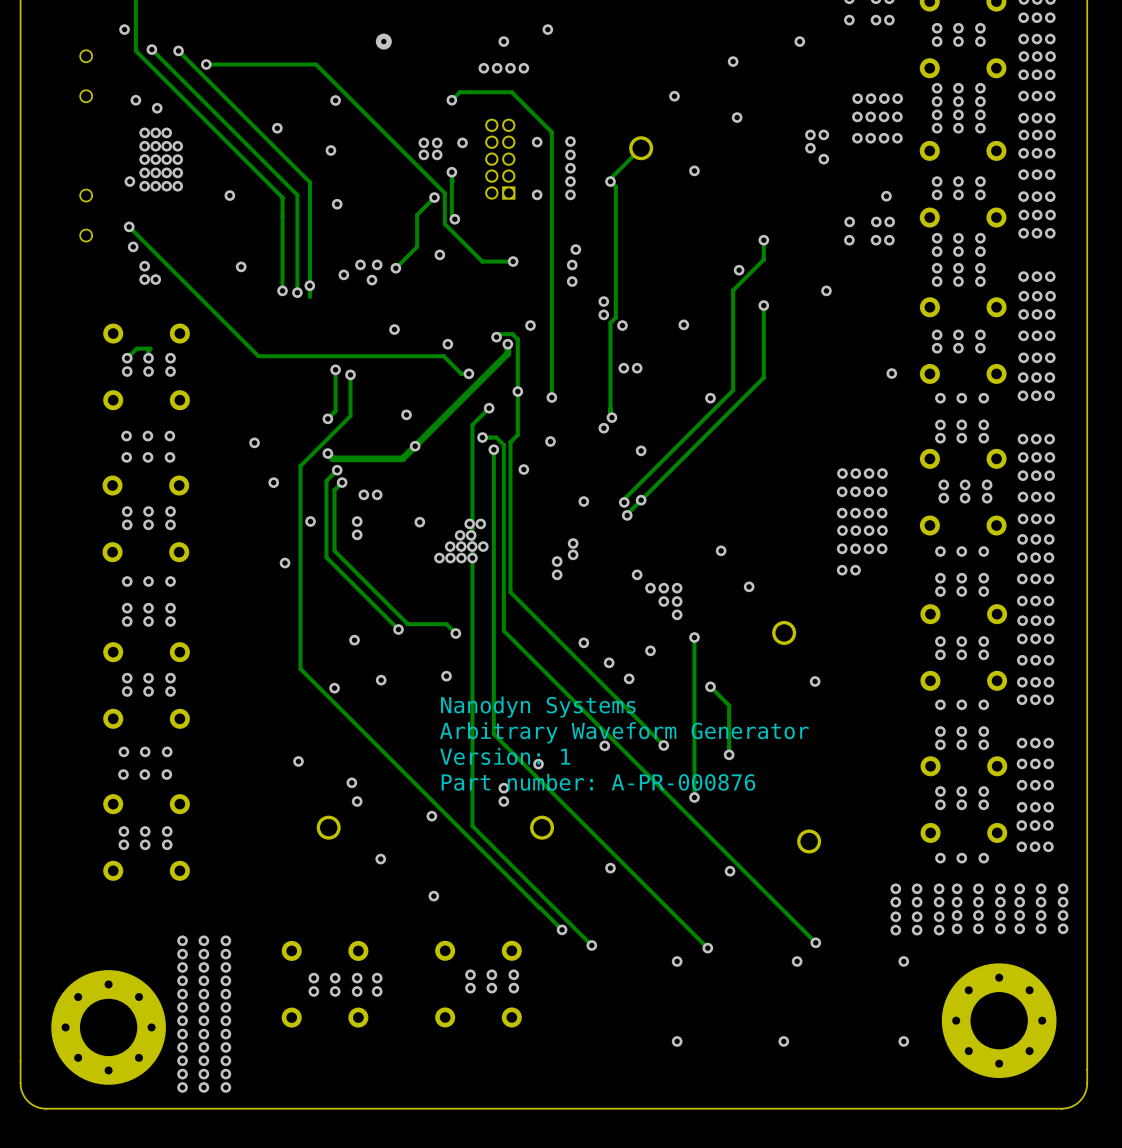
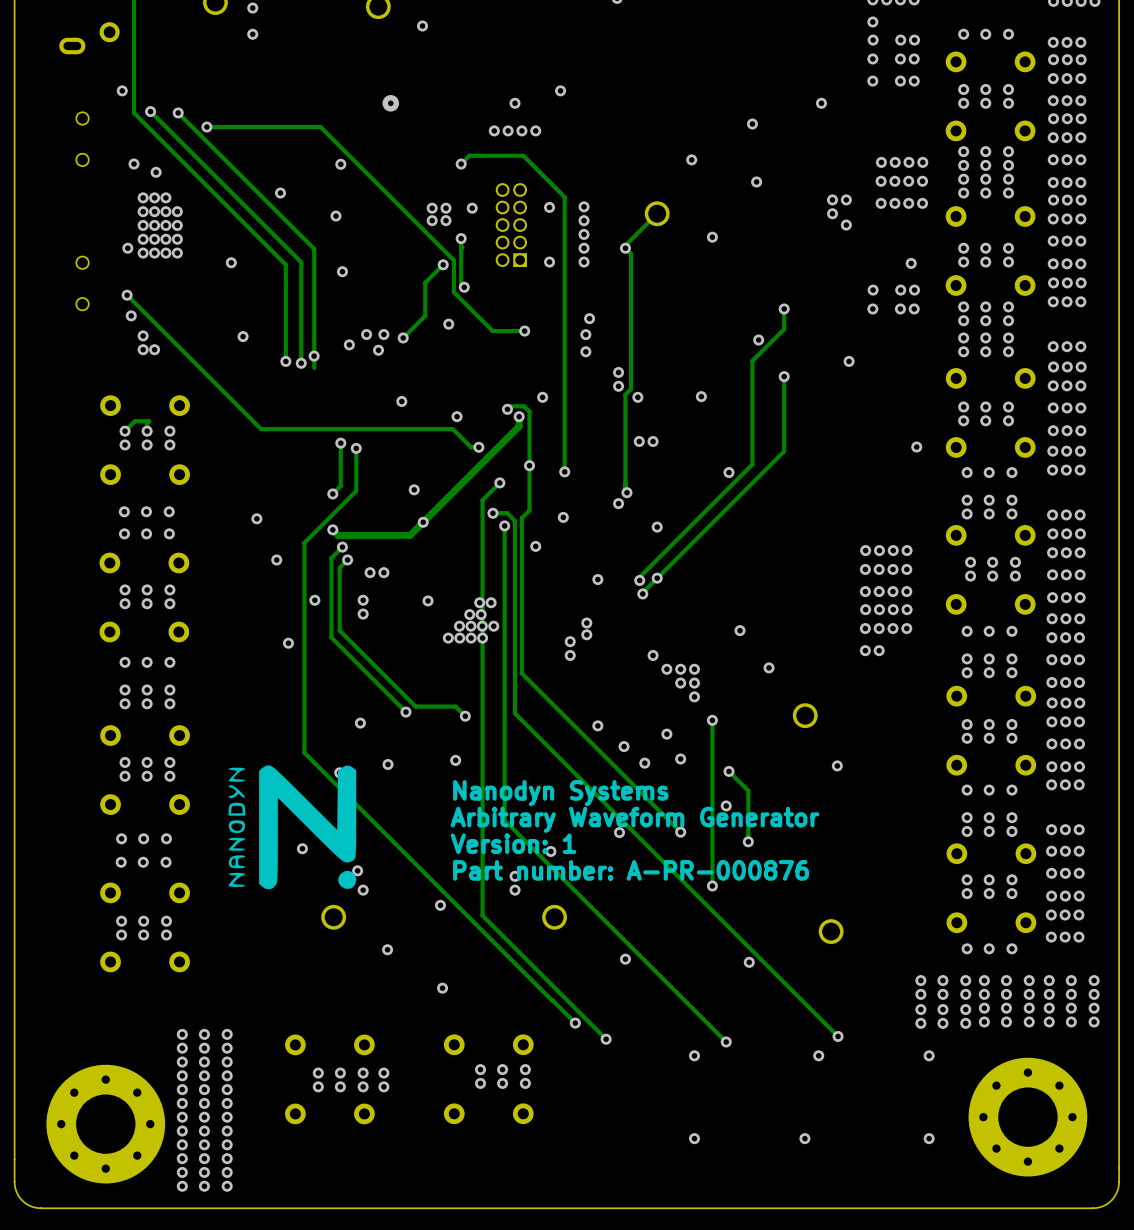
via: none -> (680, 759)
drawing: none -> [228, 765, 357, 890]
via: none -> (726, 805)

